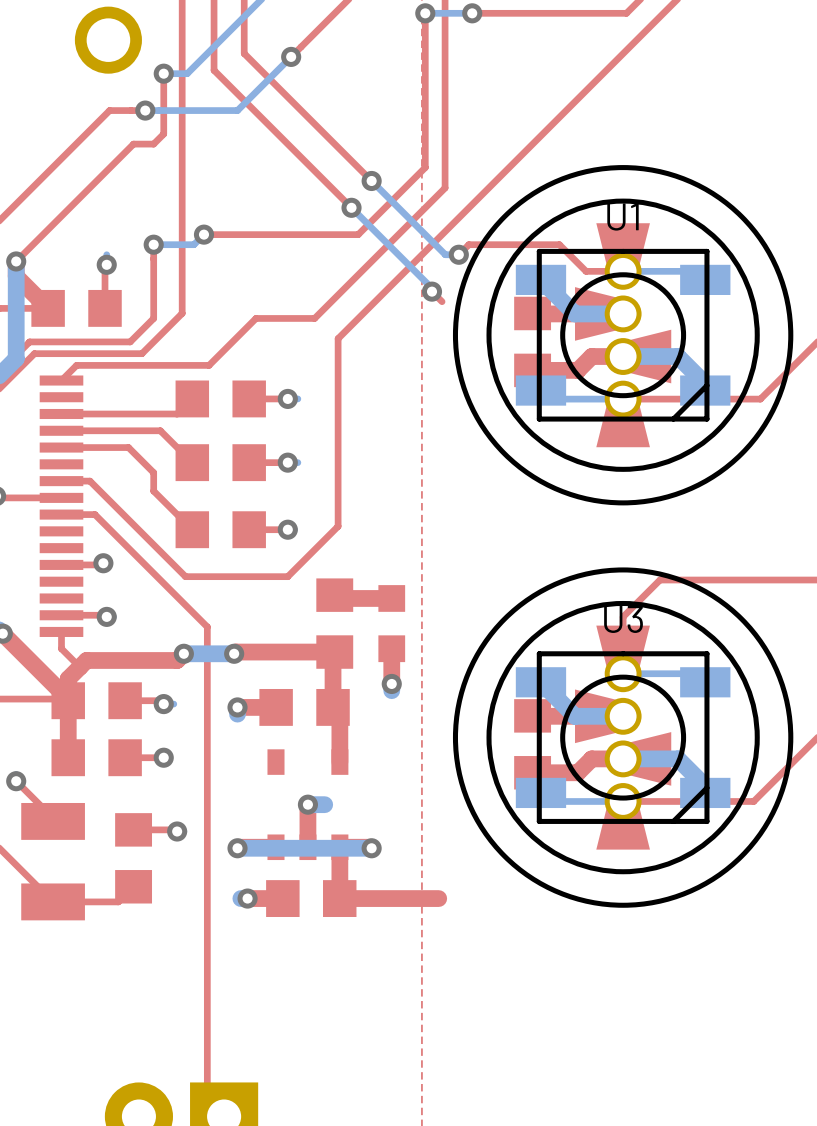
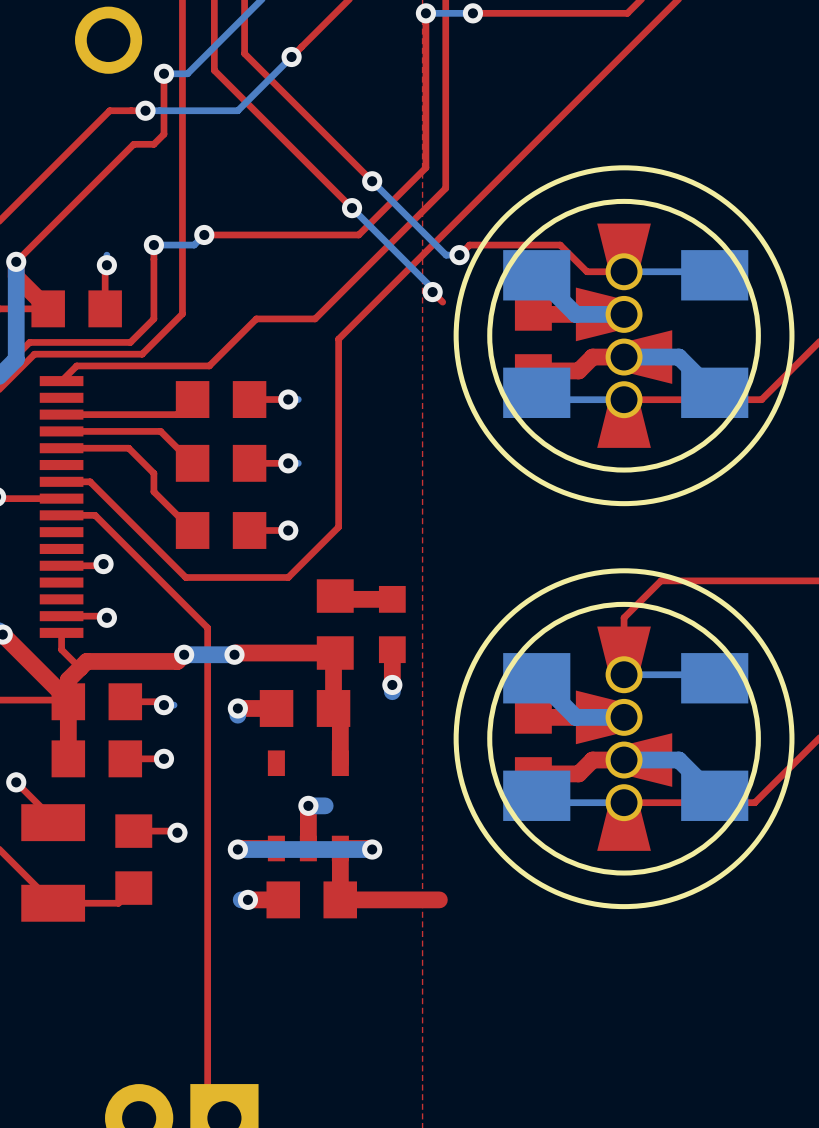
part footprint: [452, 165, 794, 506] -> [453, 165, 795, 507]
U1: (623, 335) -> none
part footprint: [452, 567, 794, 908] -> [453, 568, 795, 910]
U3: (623, 737) -> none

